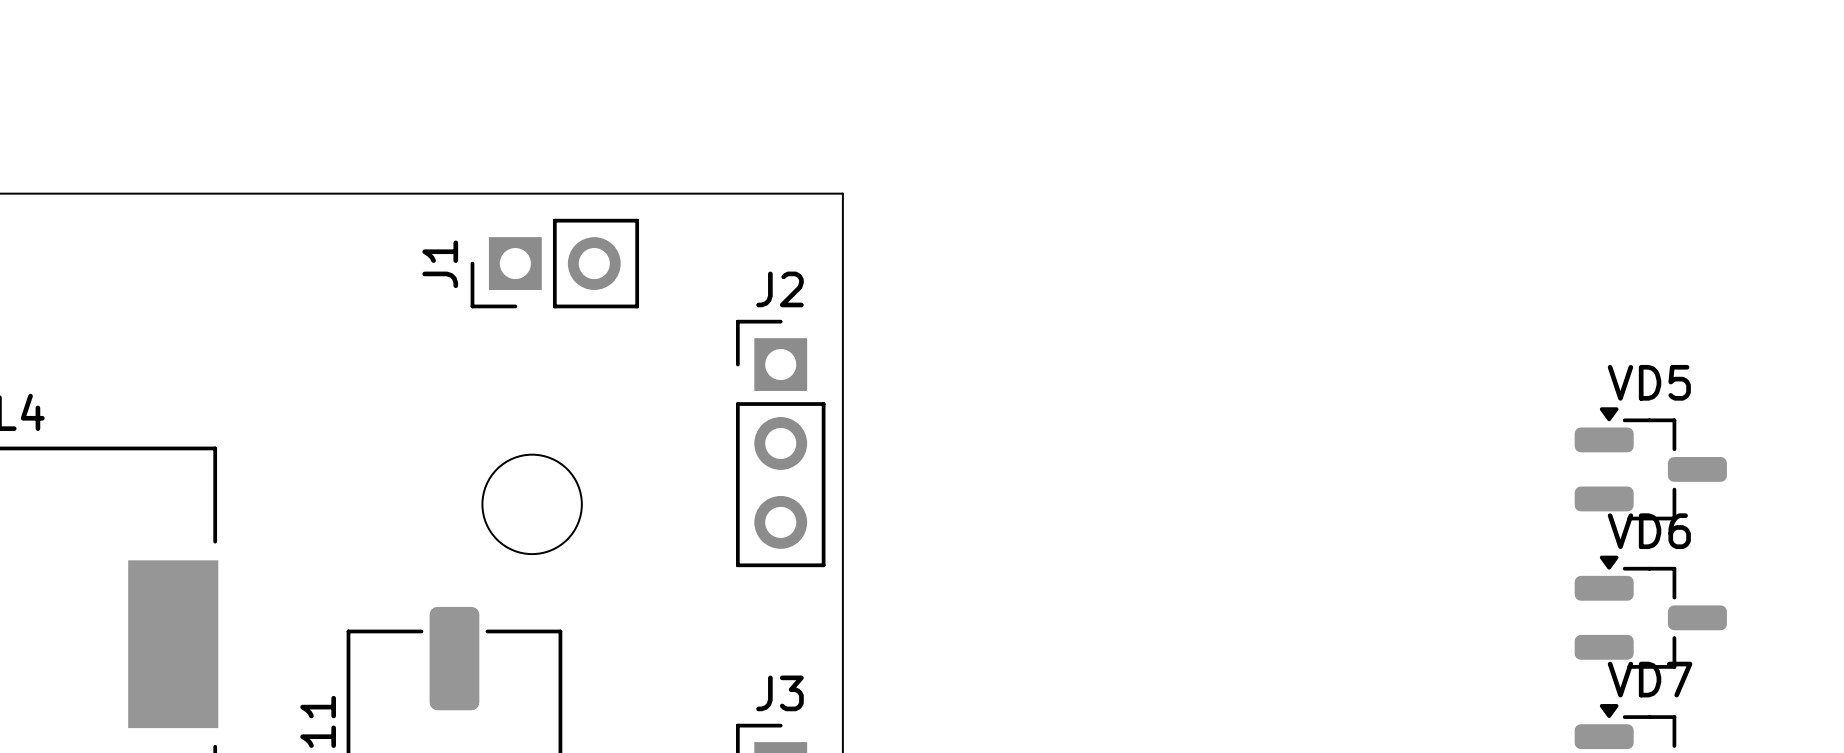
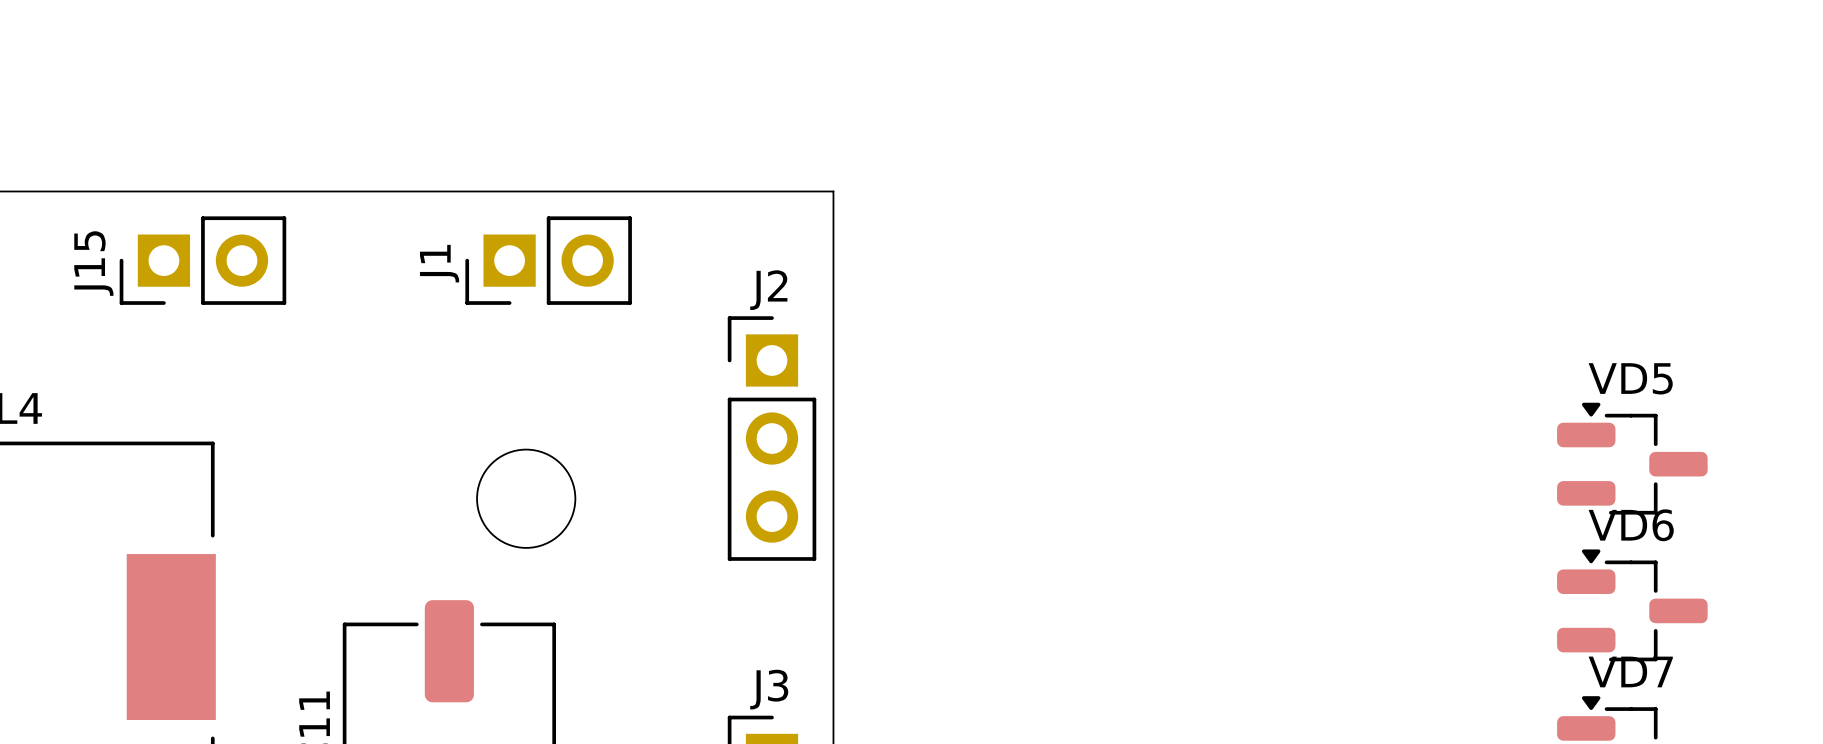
J15: none -> (202, 260)

